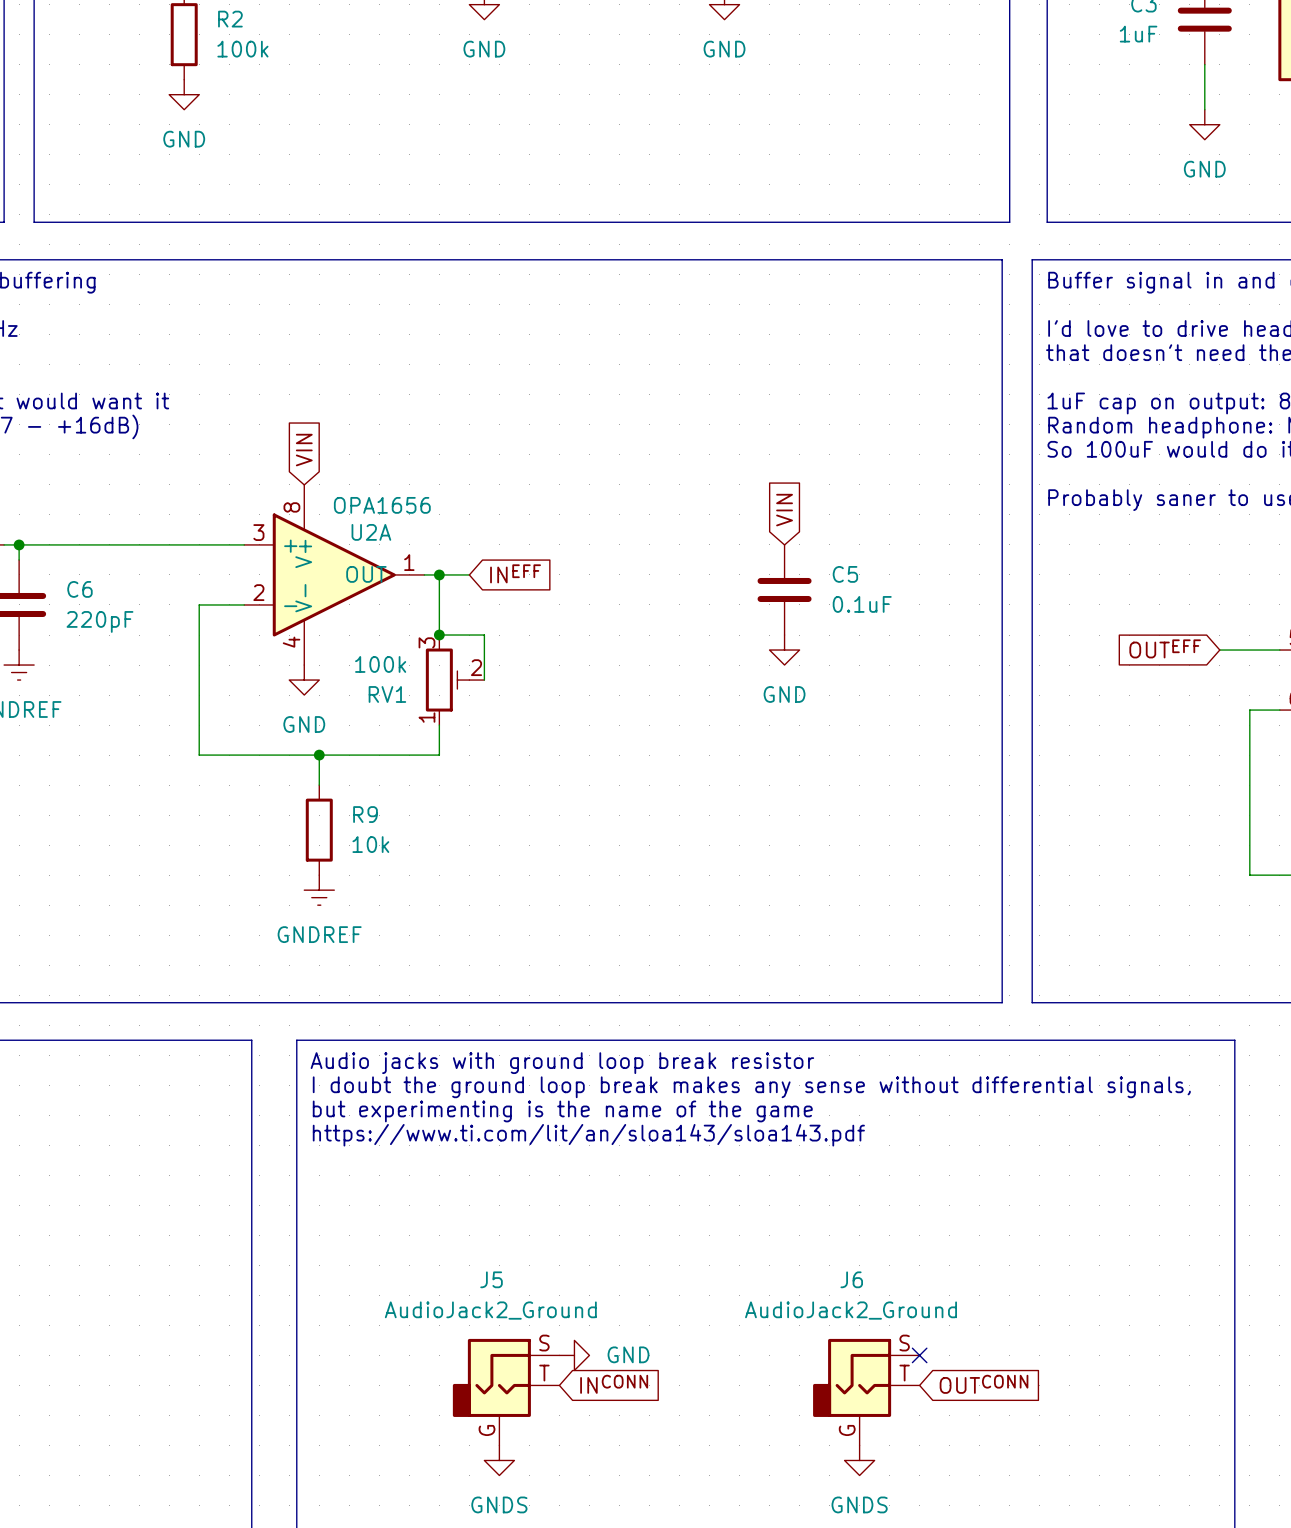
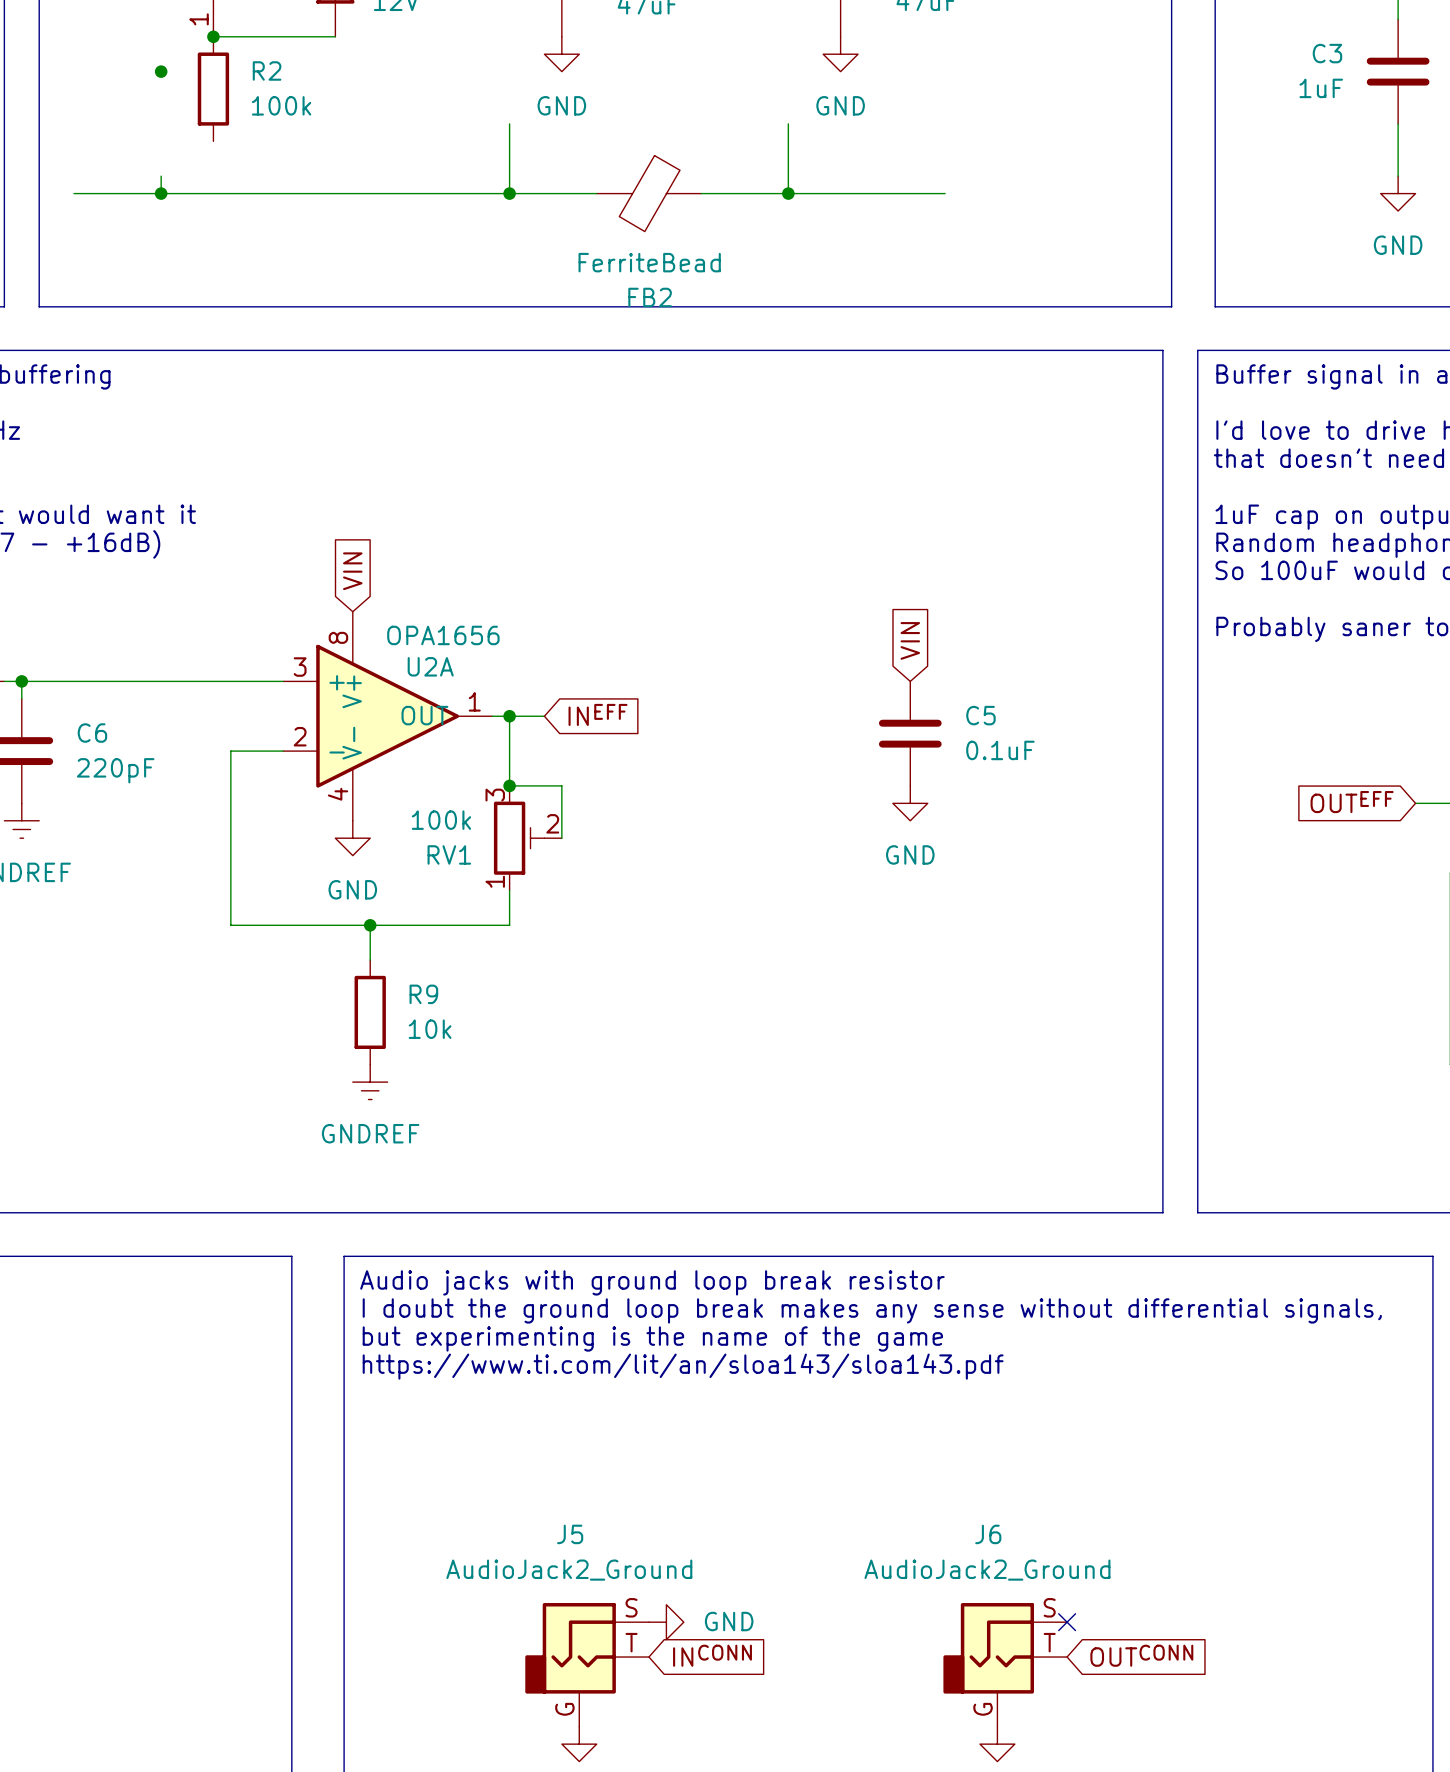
junction: none -> (161, 71)
wire: none -> (509, 123) (509, 193)
wire: none -> (788, 123) (788, 193)
power symbol: GND (184, 94) -> none
wire: none -> (161, 176) (161, 193)
wire: none -> (74, 193) (596, 193)
junction: none -> (161, 193)
junction: none -> (509, 193)
FB2: none -> FerriteBead (648, 193)
wire: none -> (701, 193) (945, 193)
junction: none -> (788, 193)

